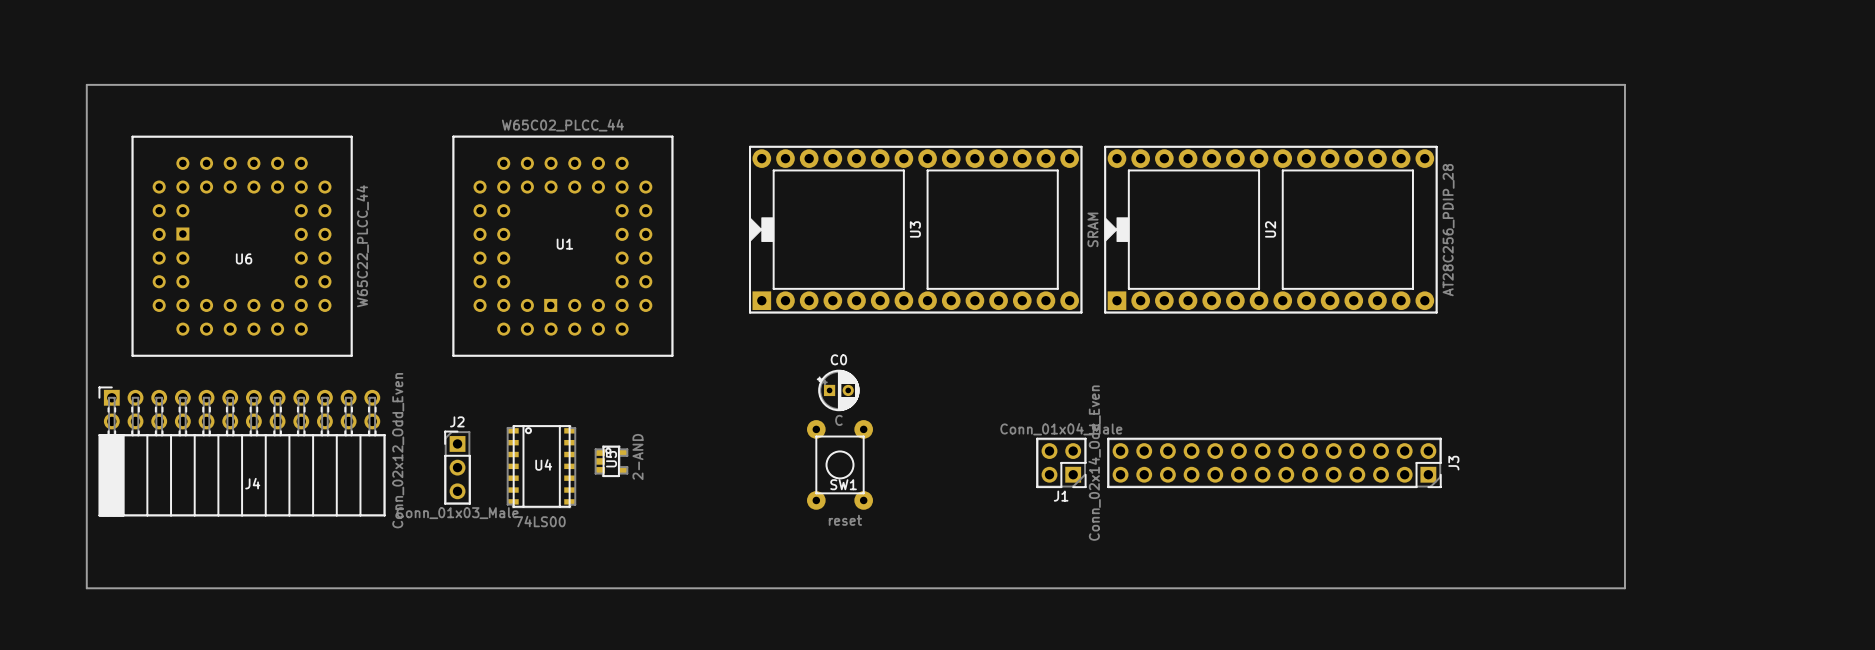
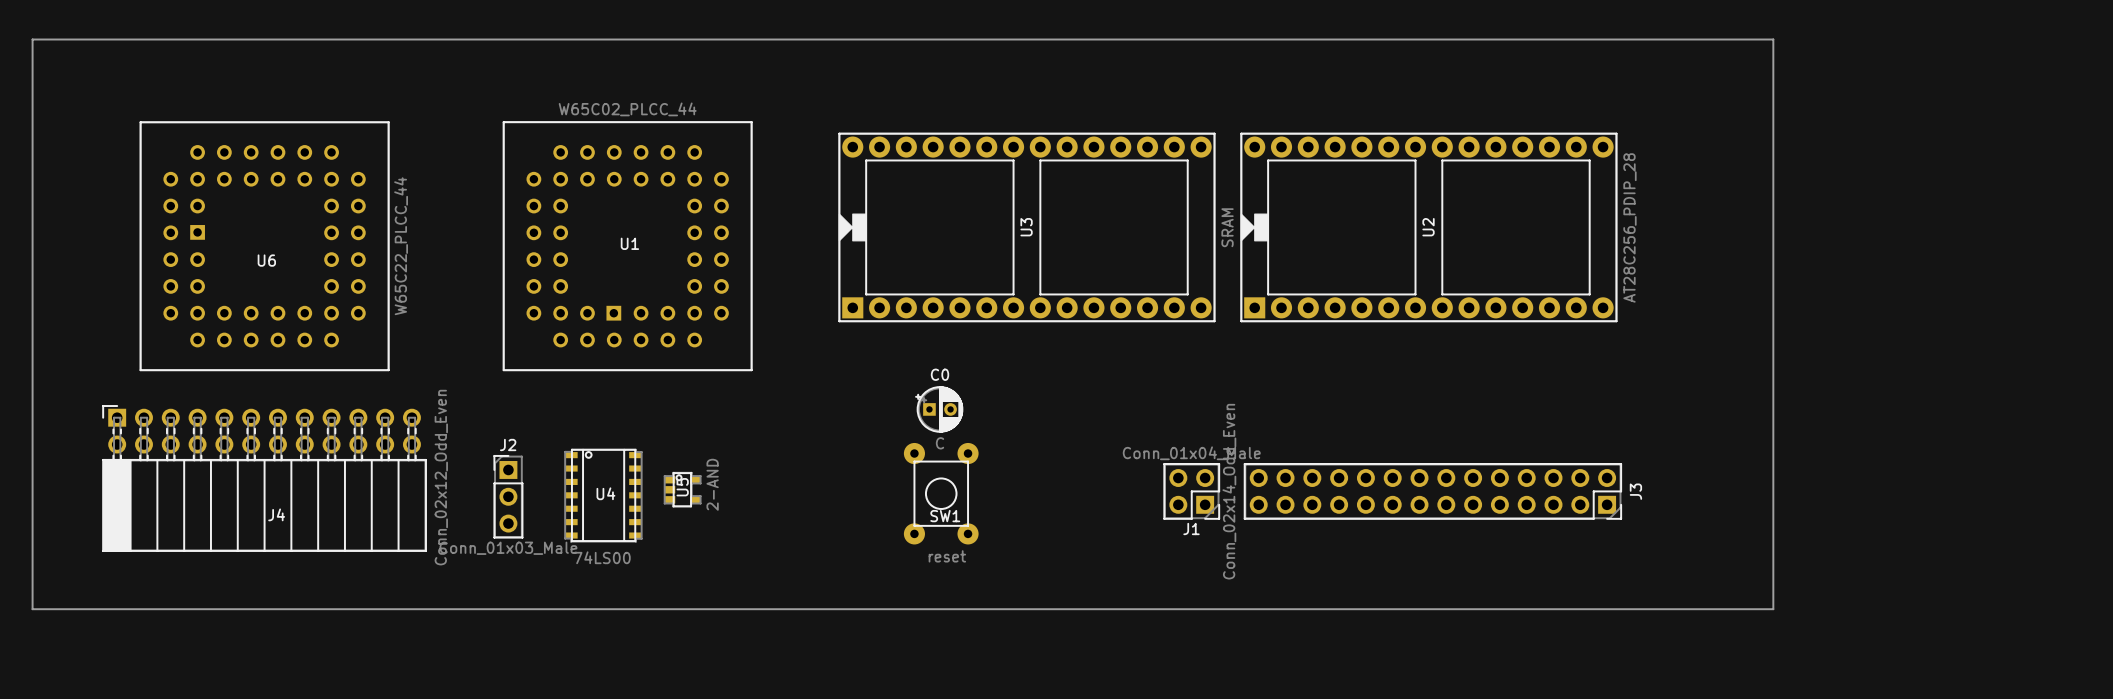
board edge: (86, 84) (1624, 84) (1624, 588) (86, 588) (86, 84) -> (32, 39) (32, 609) (1773, 609) (1773, 39) (32, 39)

